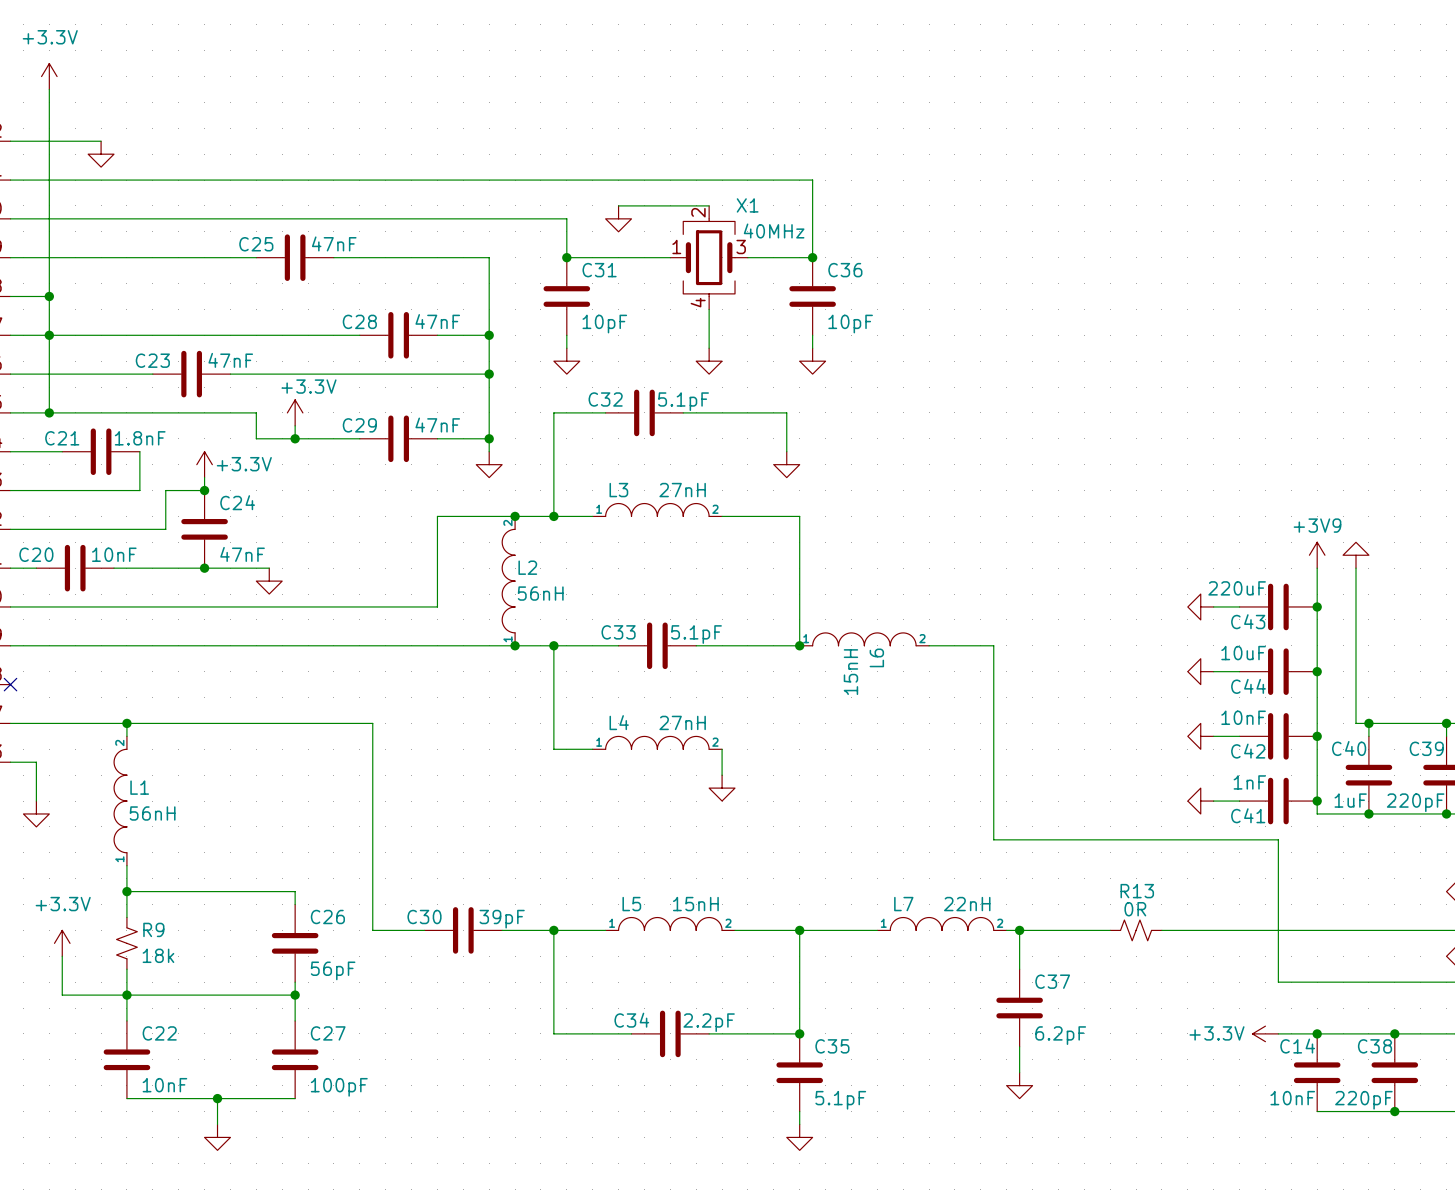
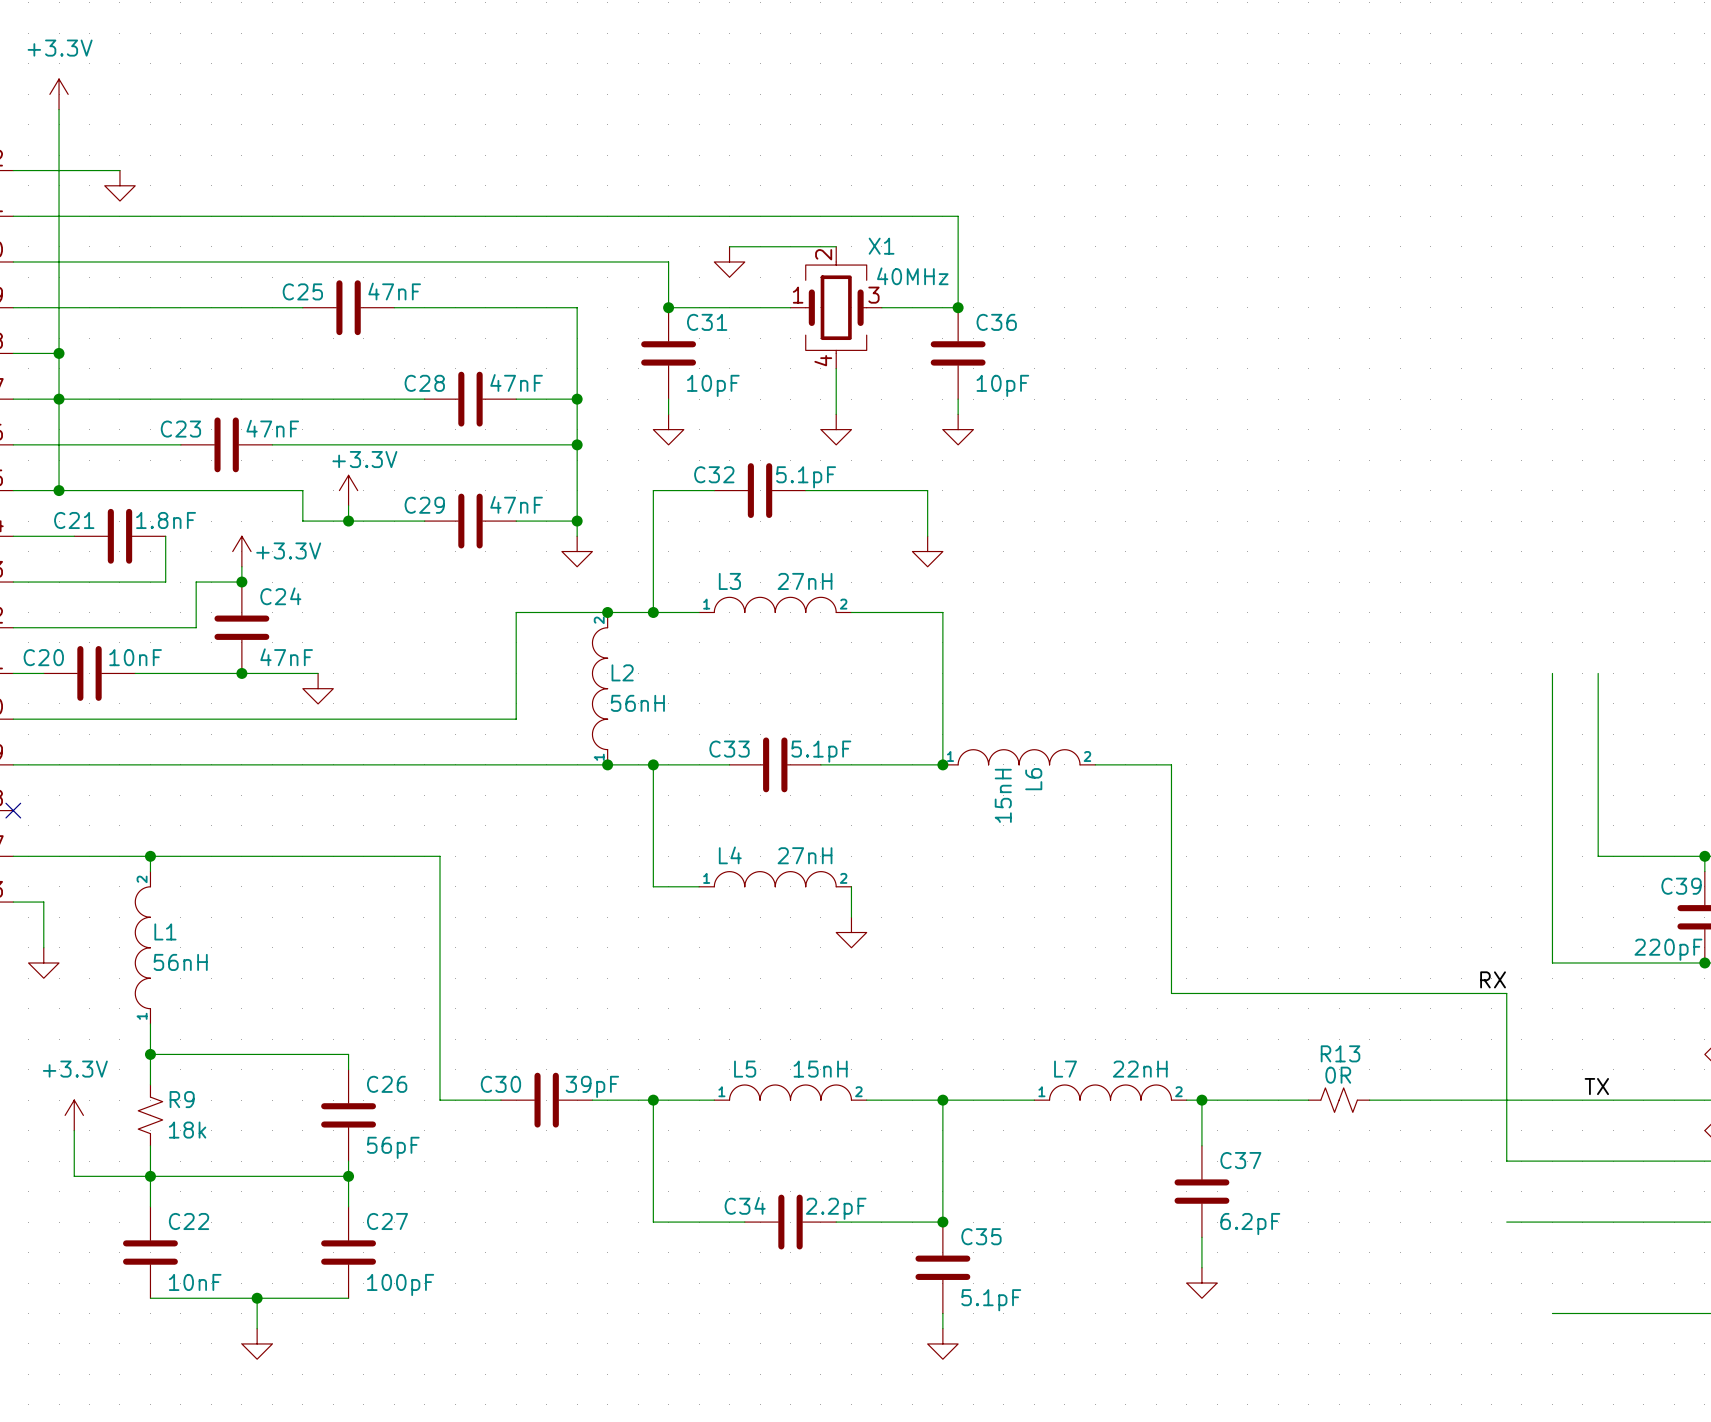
power symbol: +3V9 (1317, 555) -> none
power symbol: (1355, 555) -> none
power symbol: (1200, 606) -> none
wire: (1213, 606) (1239, 606) -> none
C43: 220uF (1278, 606) -> none
junction: (1317, 606) -> none
power symbol: (1200, 671) -> none
wire: (1213, 671) (1239, 671) -> none
C44: 10uF (1278, 671) -> none
junction: (1317, 671) -> none
wire: (1368, 723) (1368, 736) -> none
junction: (1368, 723) -> none
power symbol: (1200, 736) -> none
wire: (1213, 736) (1239, 736) -> none
C42: 10nF (1278, 736) -> none
junction: (1317, 736) -> none
C40: 1uF (1368, 775) -> none
power symbol: (1200, 801) -> none
wire: (1213, 801) (1239, 801) -> none
C41: 1nF (1278, 801) -> none
junction: (1317, 801) -> none
junction: (1368, 813) -> none
label: none -> RX (1493, 979)
label: none -> TX (1596, 1086)
power symbol: +3.3V (1265, 1033) -> none
junction: (1317, 1033) -> none
junction: (1394, 1033) -> none
C14: 10nF (1317, 1072) -> none
C38: 220pF (1394, 1072) -> none
junction: (1394, 1111) -> none

